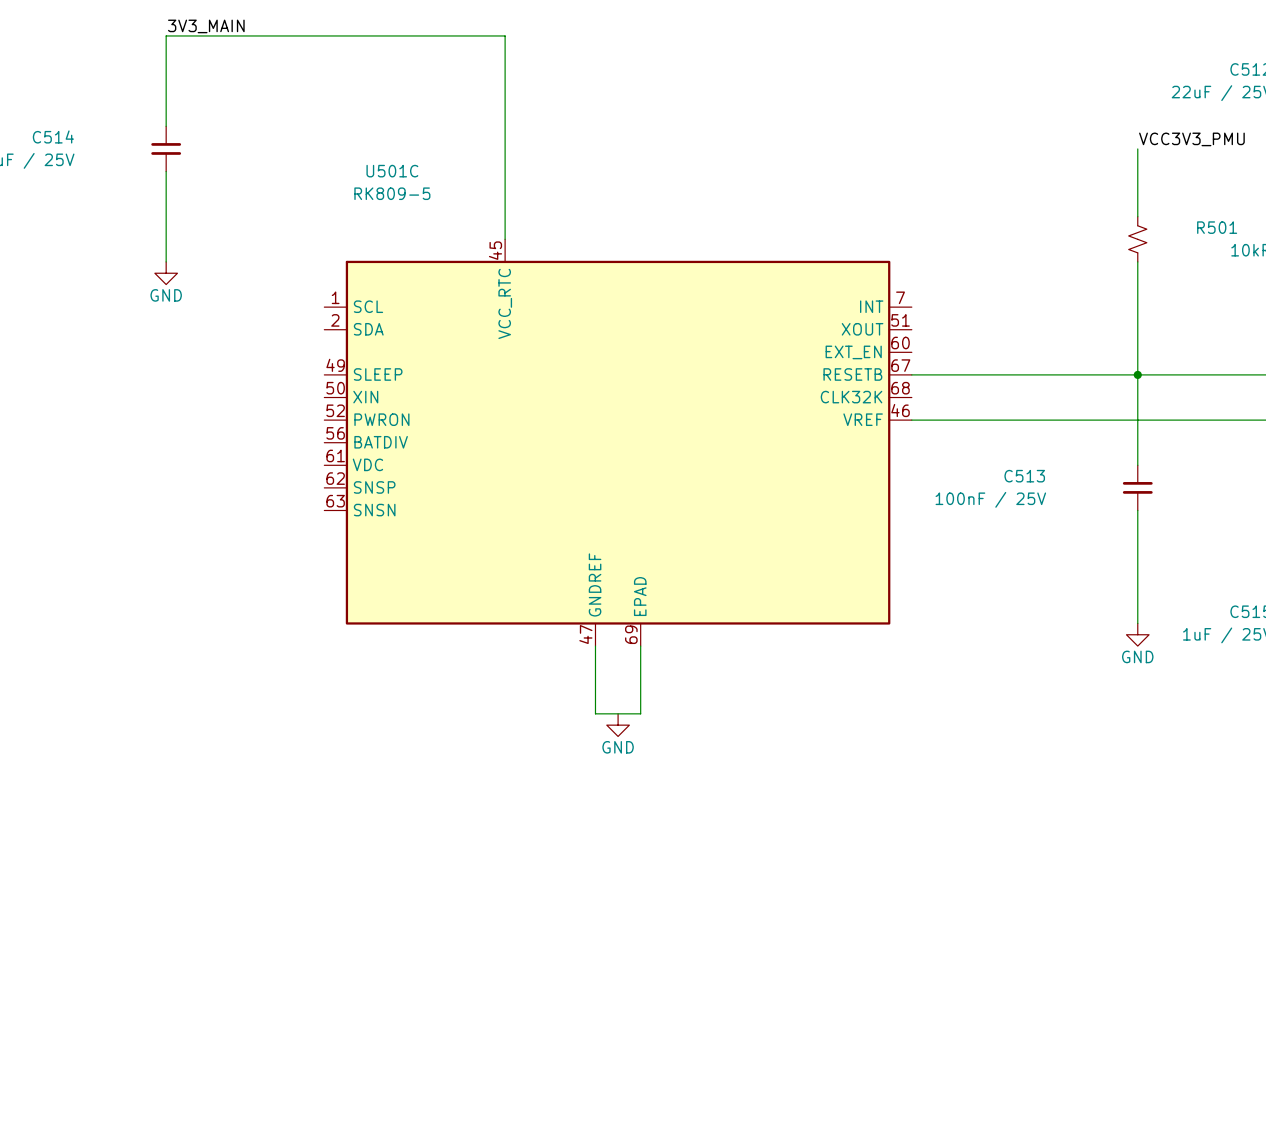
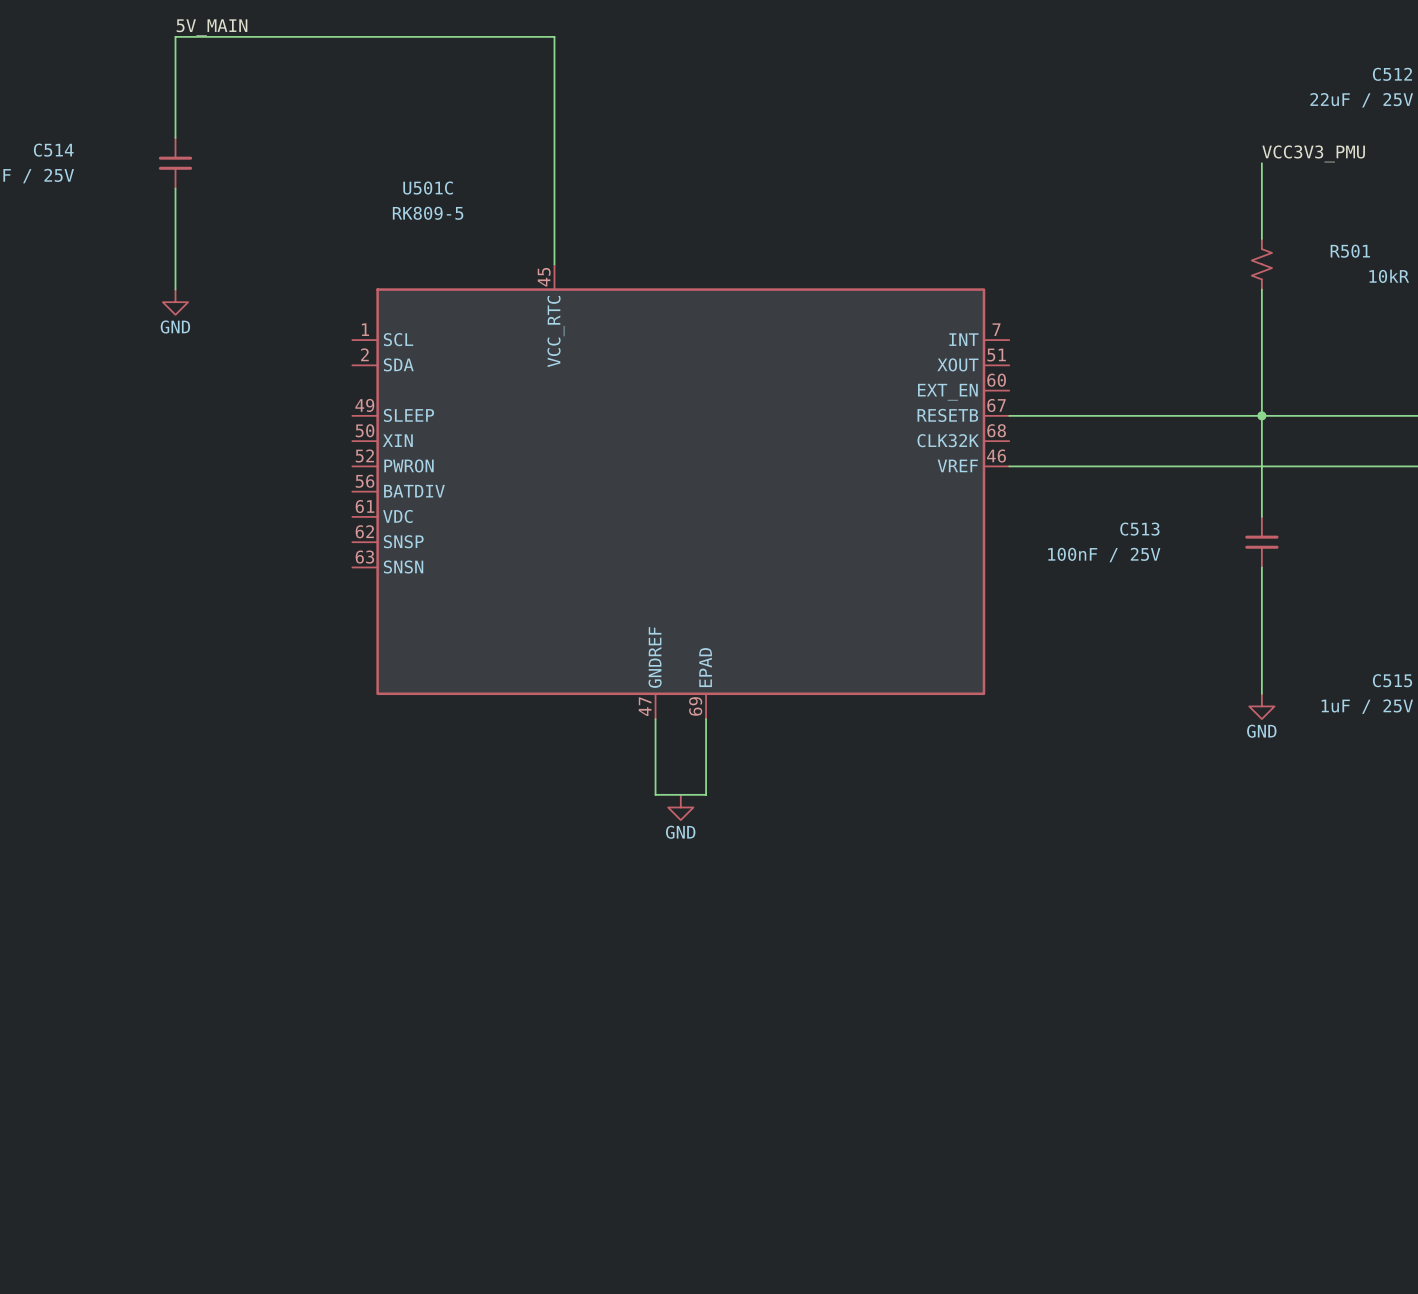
label: 3V3_MAIN (206, 26) -> 5V_MAIN (212, 27)

